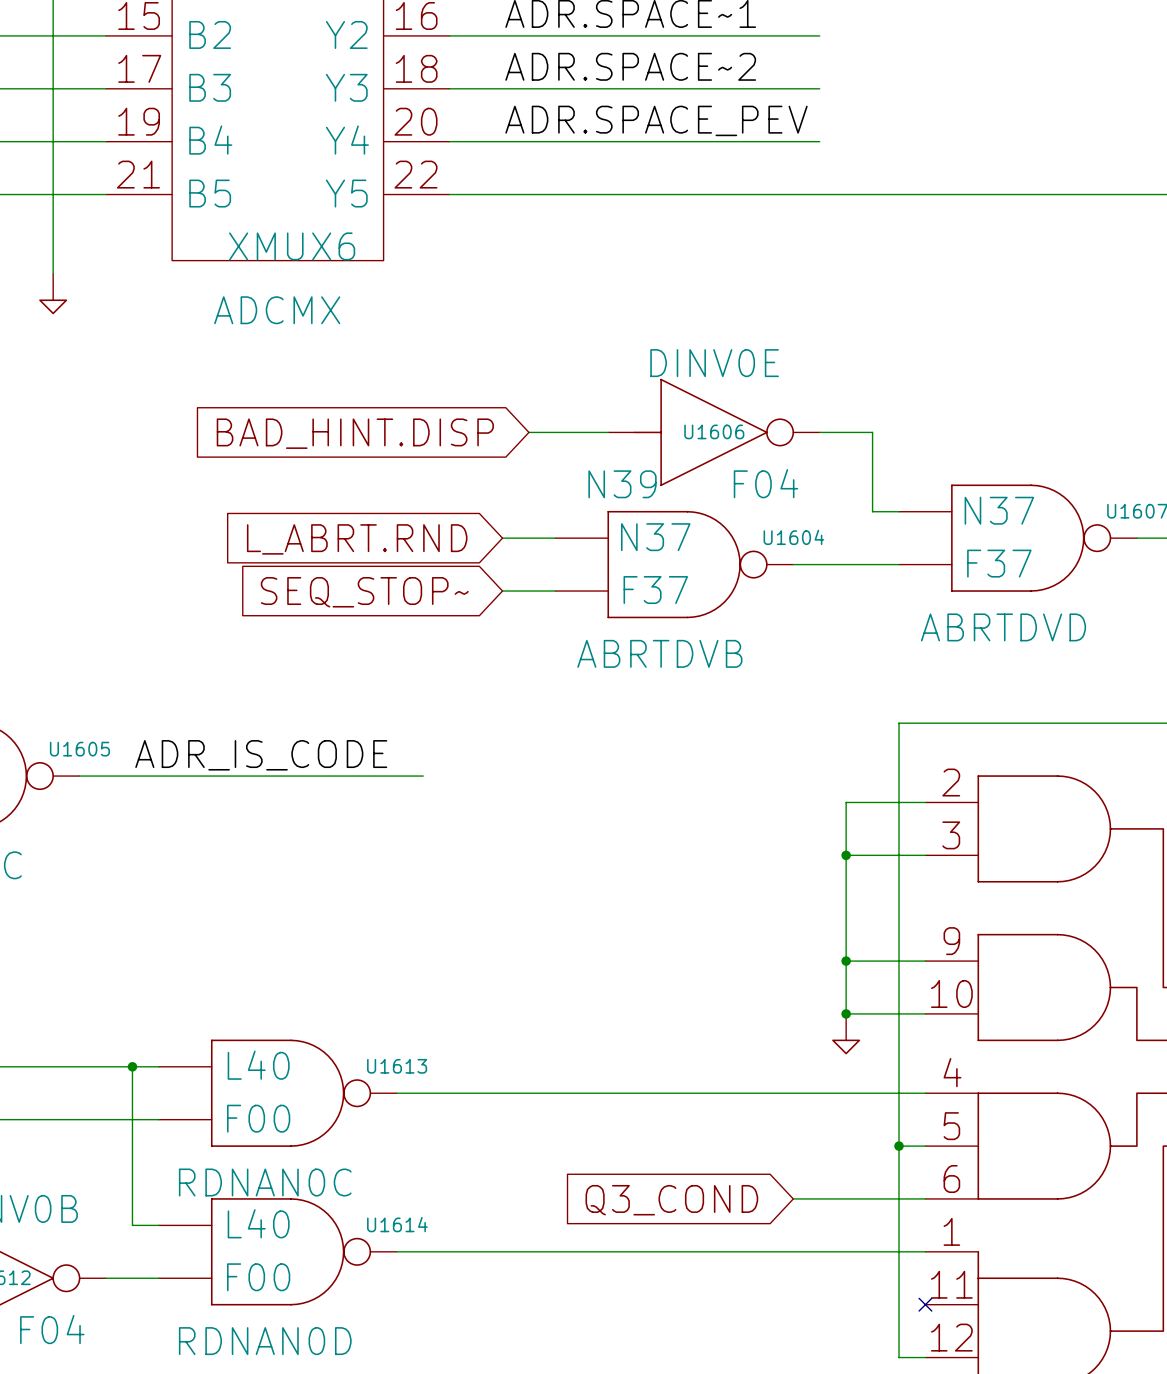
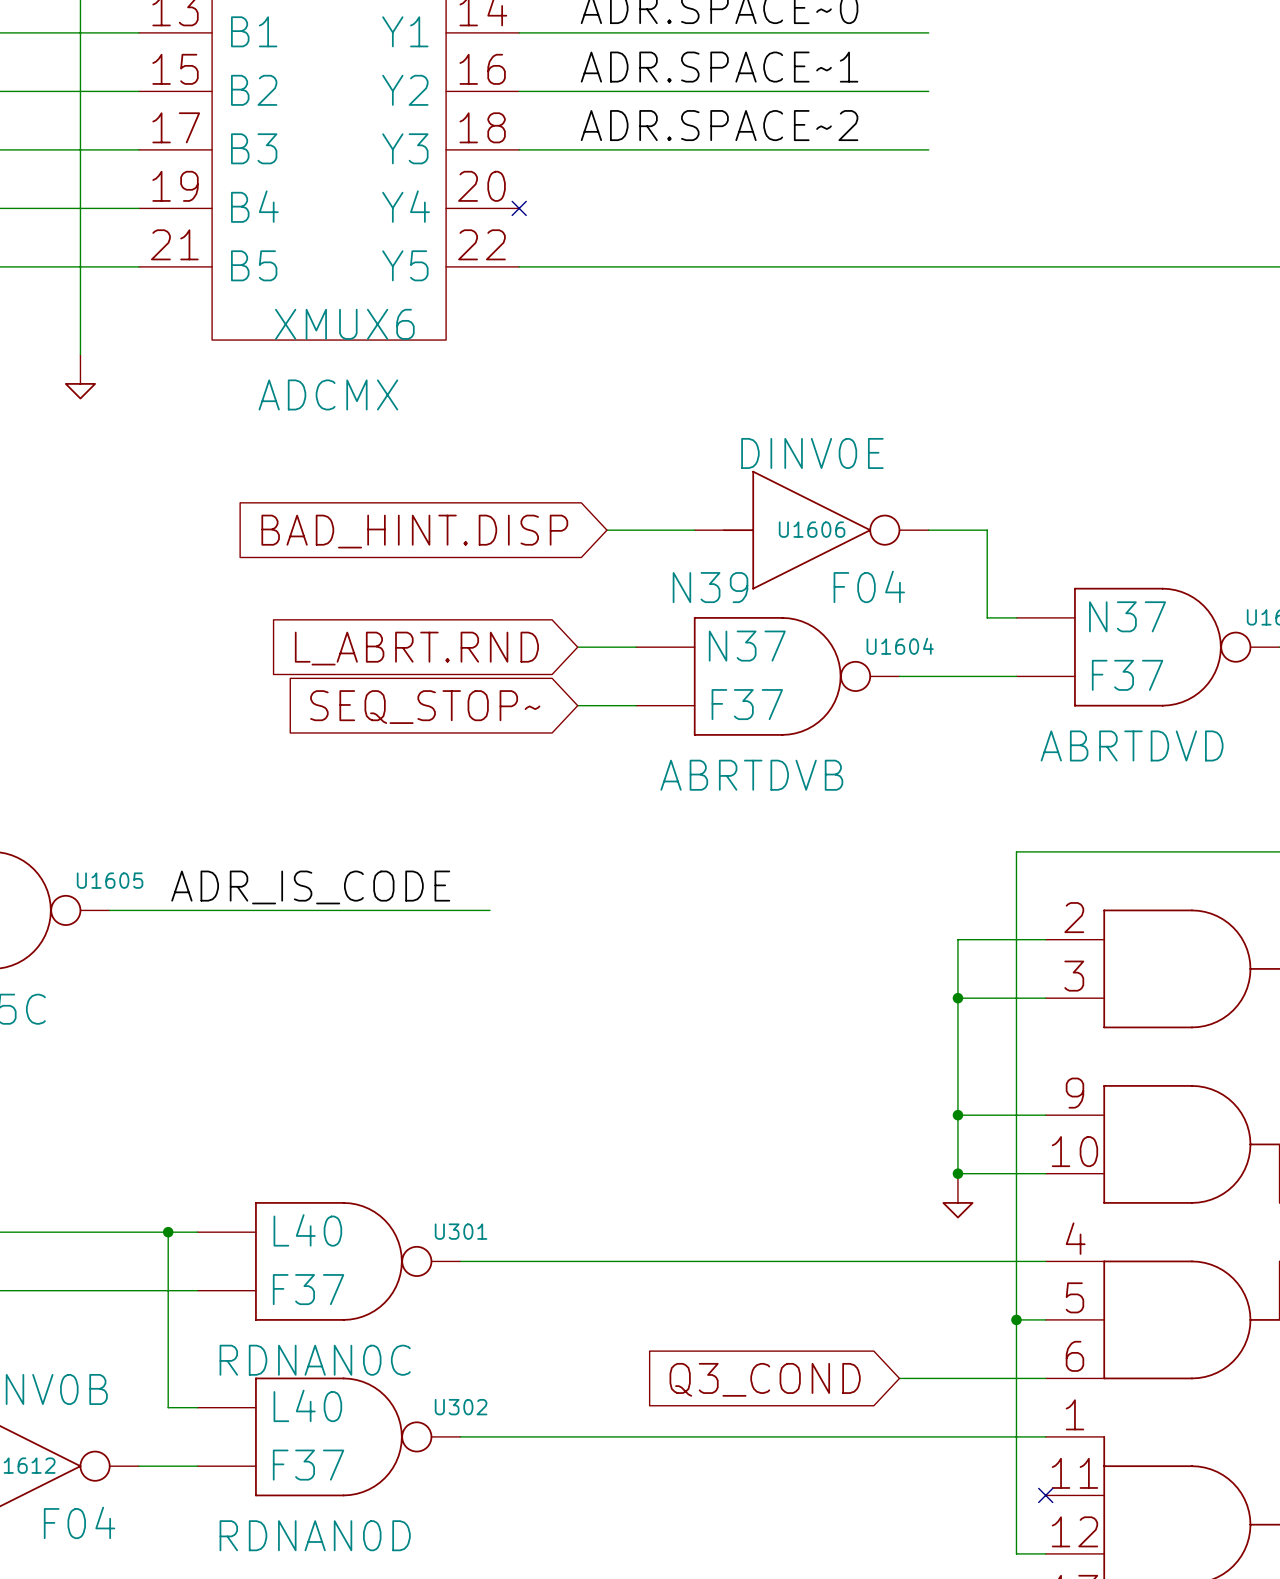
label: ADR.SPACE_PEV (656, 120) -> none
wire: (449, 141) (819, 141) -> none
no-connect mark: none -> (519, 208)
U1613 name: U1613 (397, 1066) -> U301 (461, 1231)
U1613 value: F00 (258, 1118) -> F37 (308, 1289)
U1614 name: U1614 (397, 1224) -> U302 (461, 1407)
U1614 value: F00 (258, 1277) -> F37 (308, 1465)

